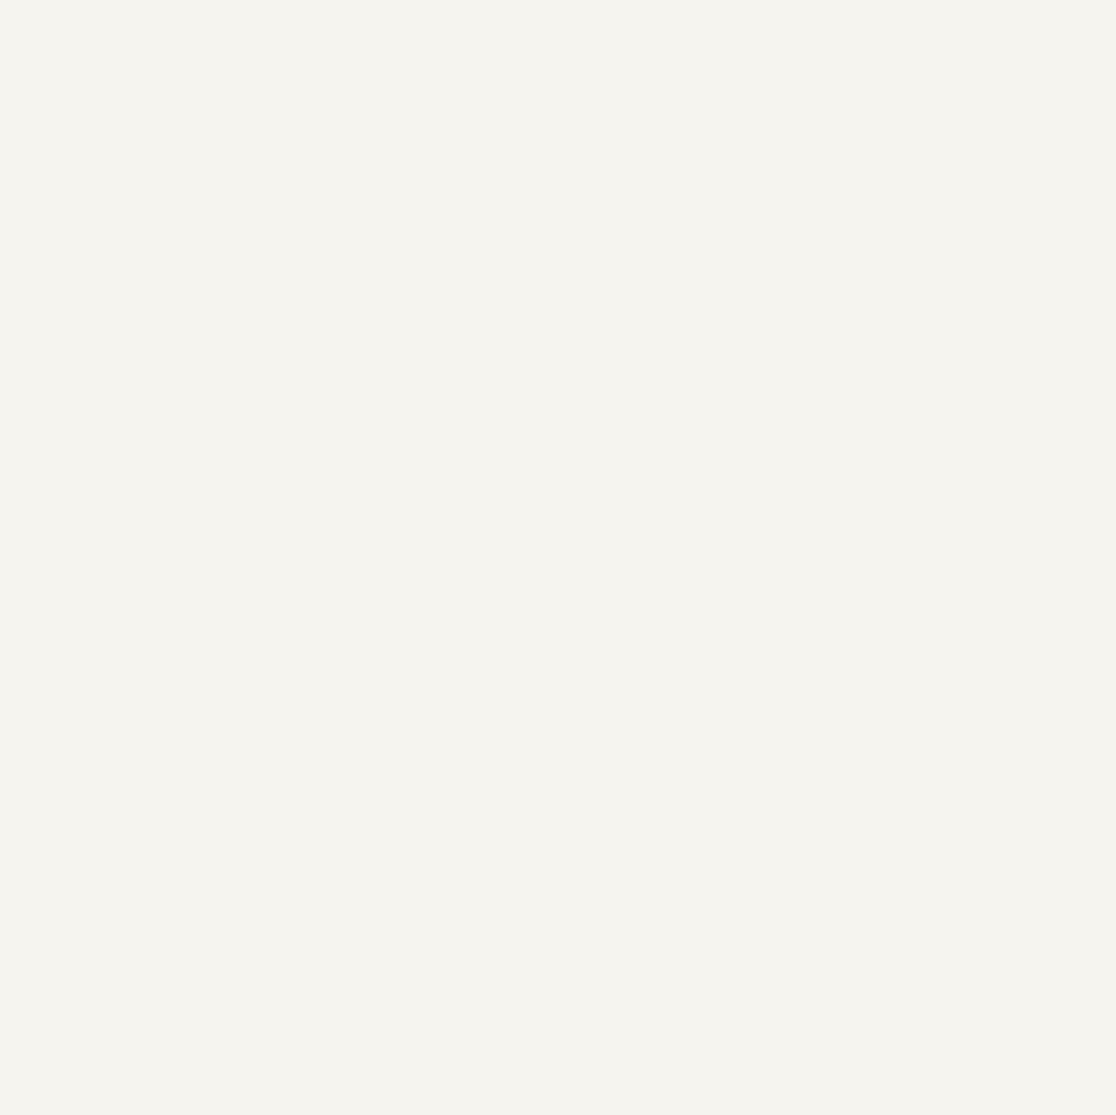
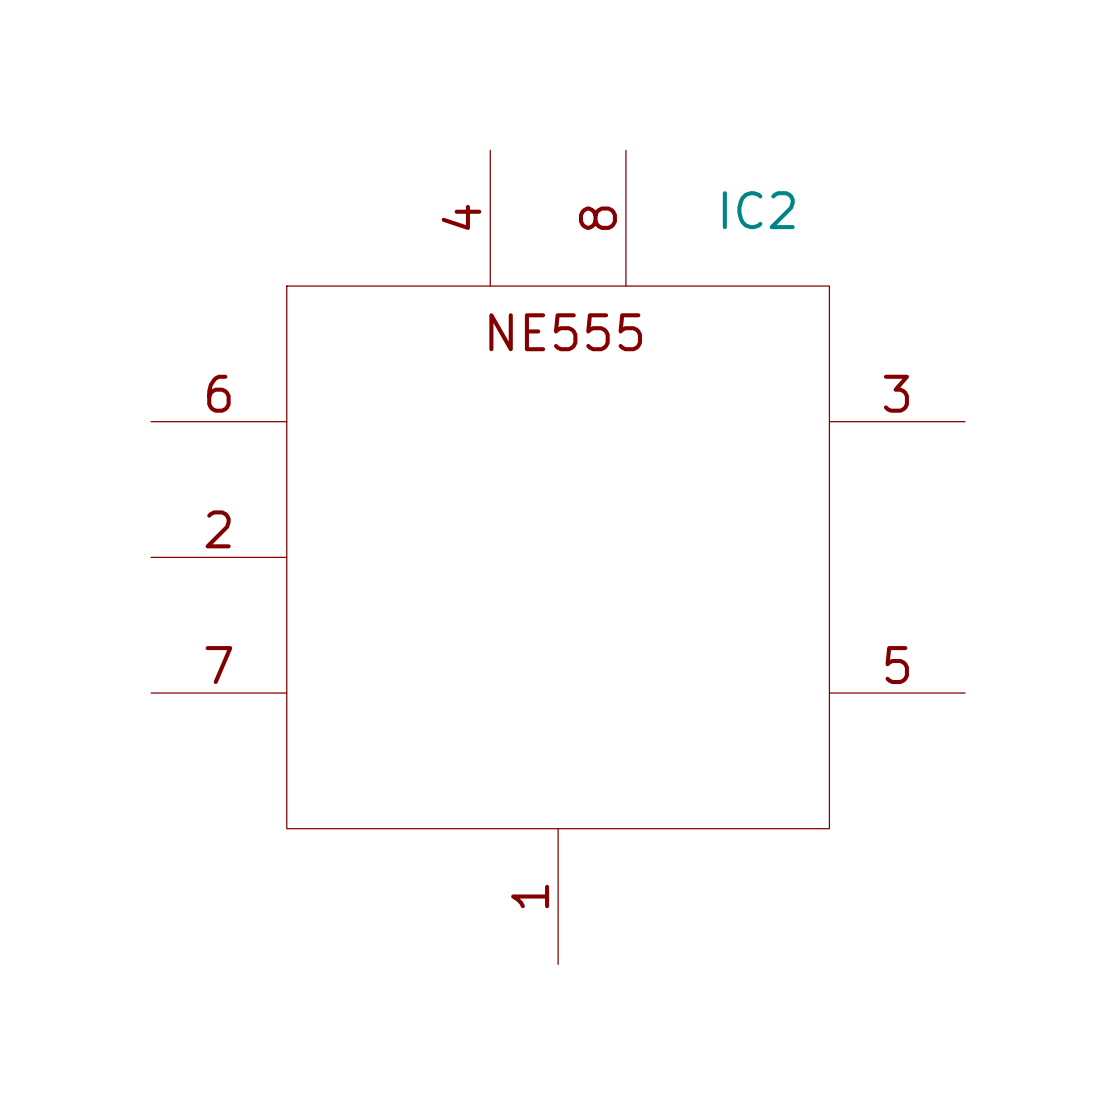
IC2: none -> (558, 557)

